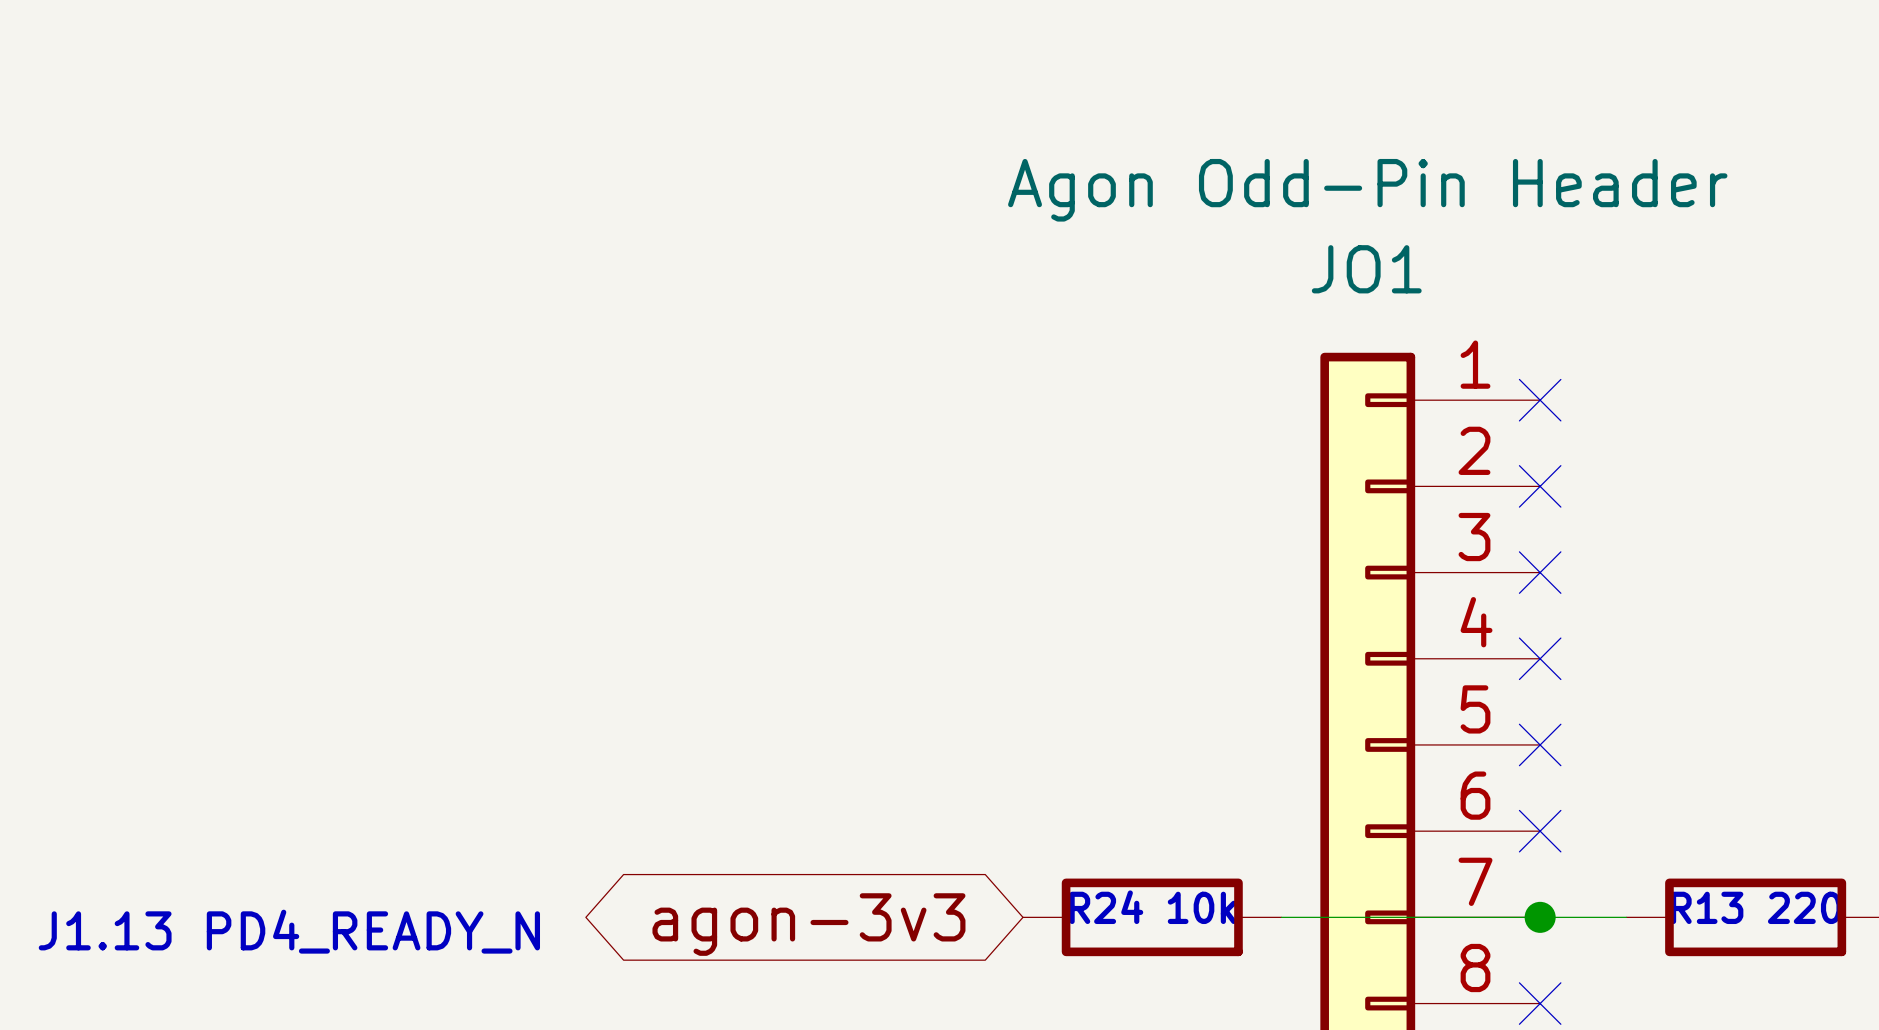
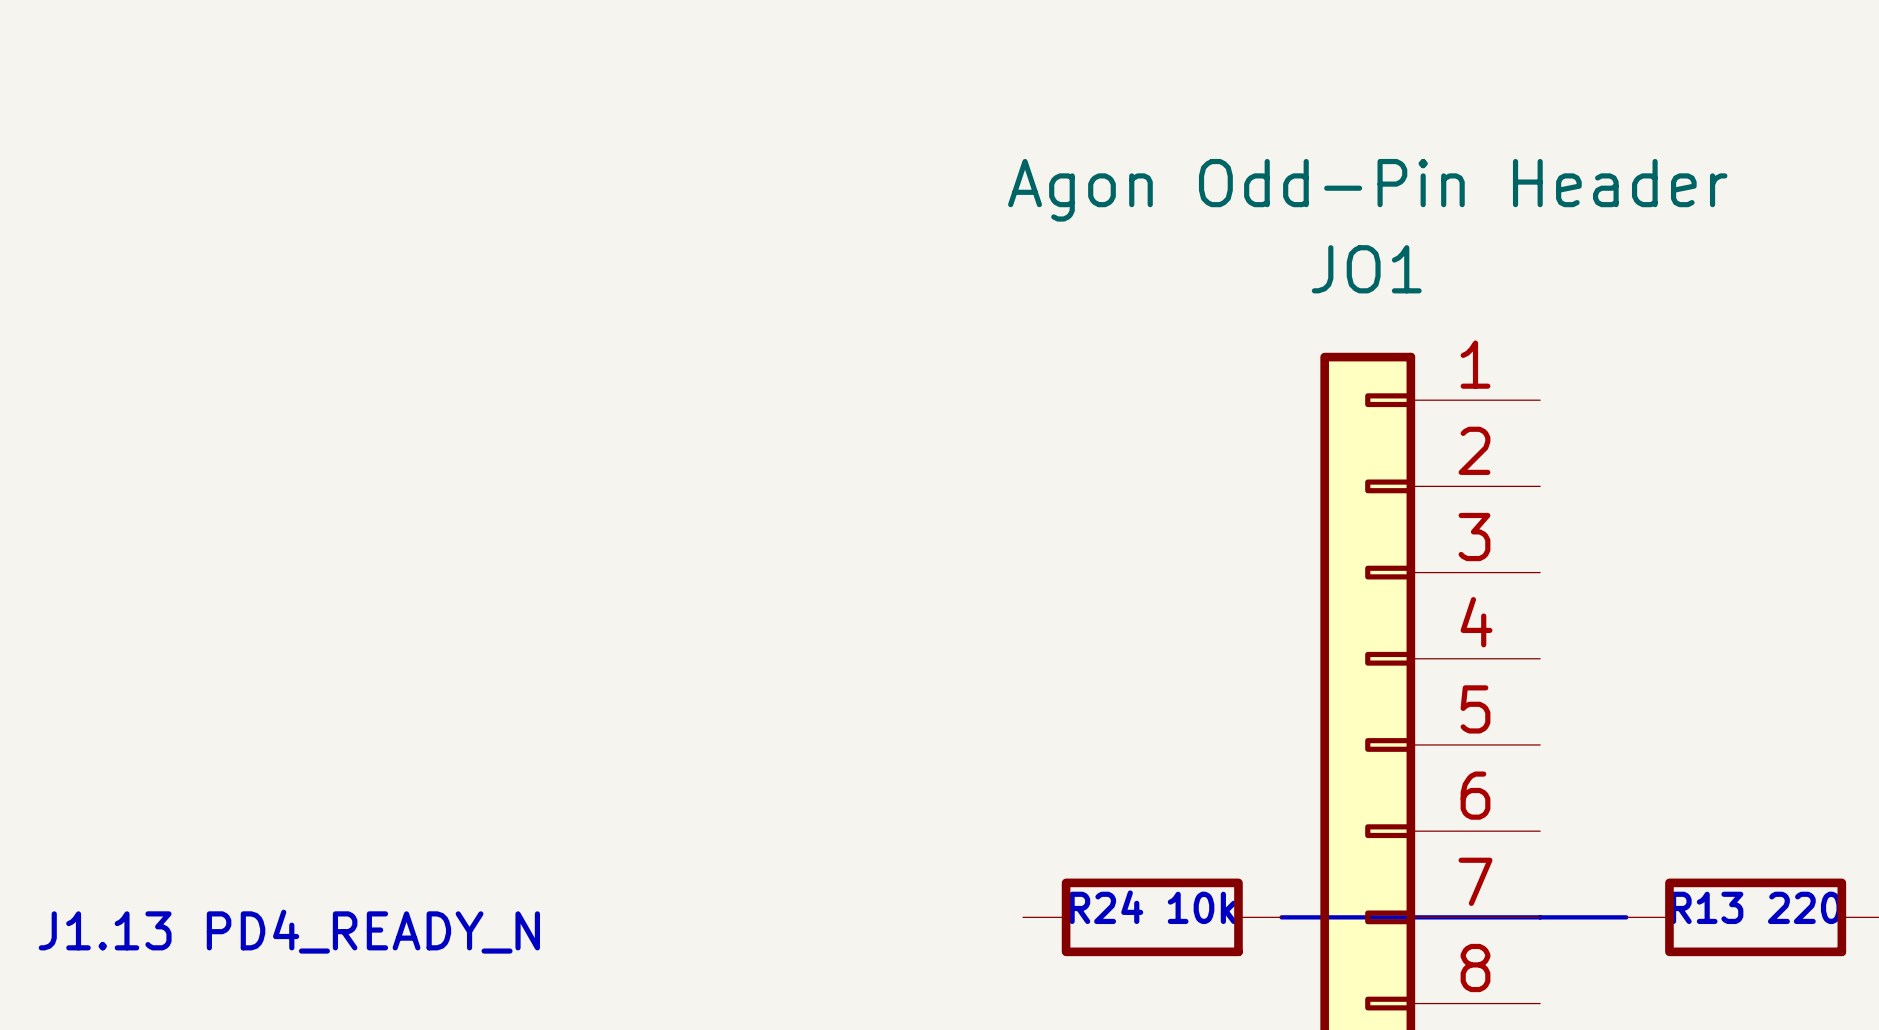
no-connect mark: (1540, 400) -> none
no-connect mark: (1540, 486) -> none
no-connect mark: (1540, 572) -> none
no-connect mark: (1540, 658) -> none
no-connect mark: (1540, 744) -> none
no-connect mark: (1540, 831) -> none
line: none -> (1281, 917) (1626, 917)
junction: (1540, 917) -> none
global label: agon-3v3 (808, 924) -> none
no-connect mark: (1540, 1003) -> none

